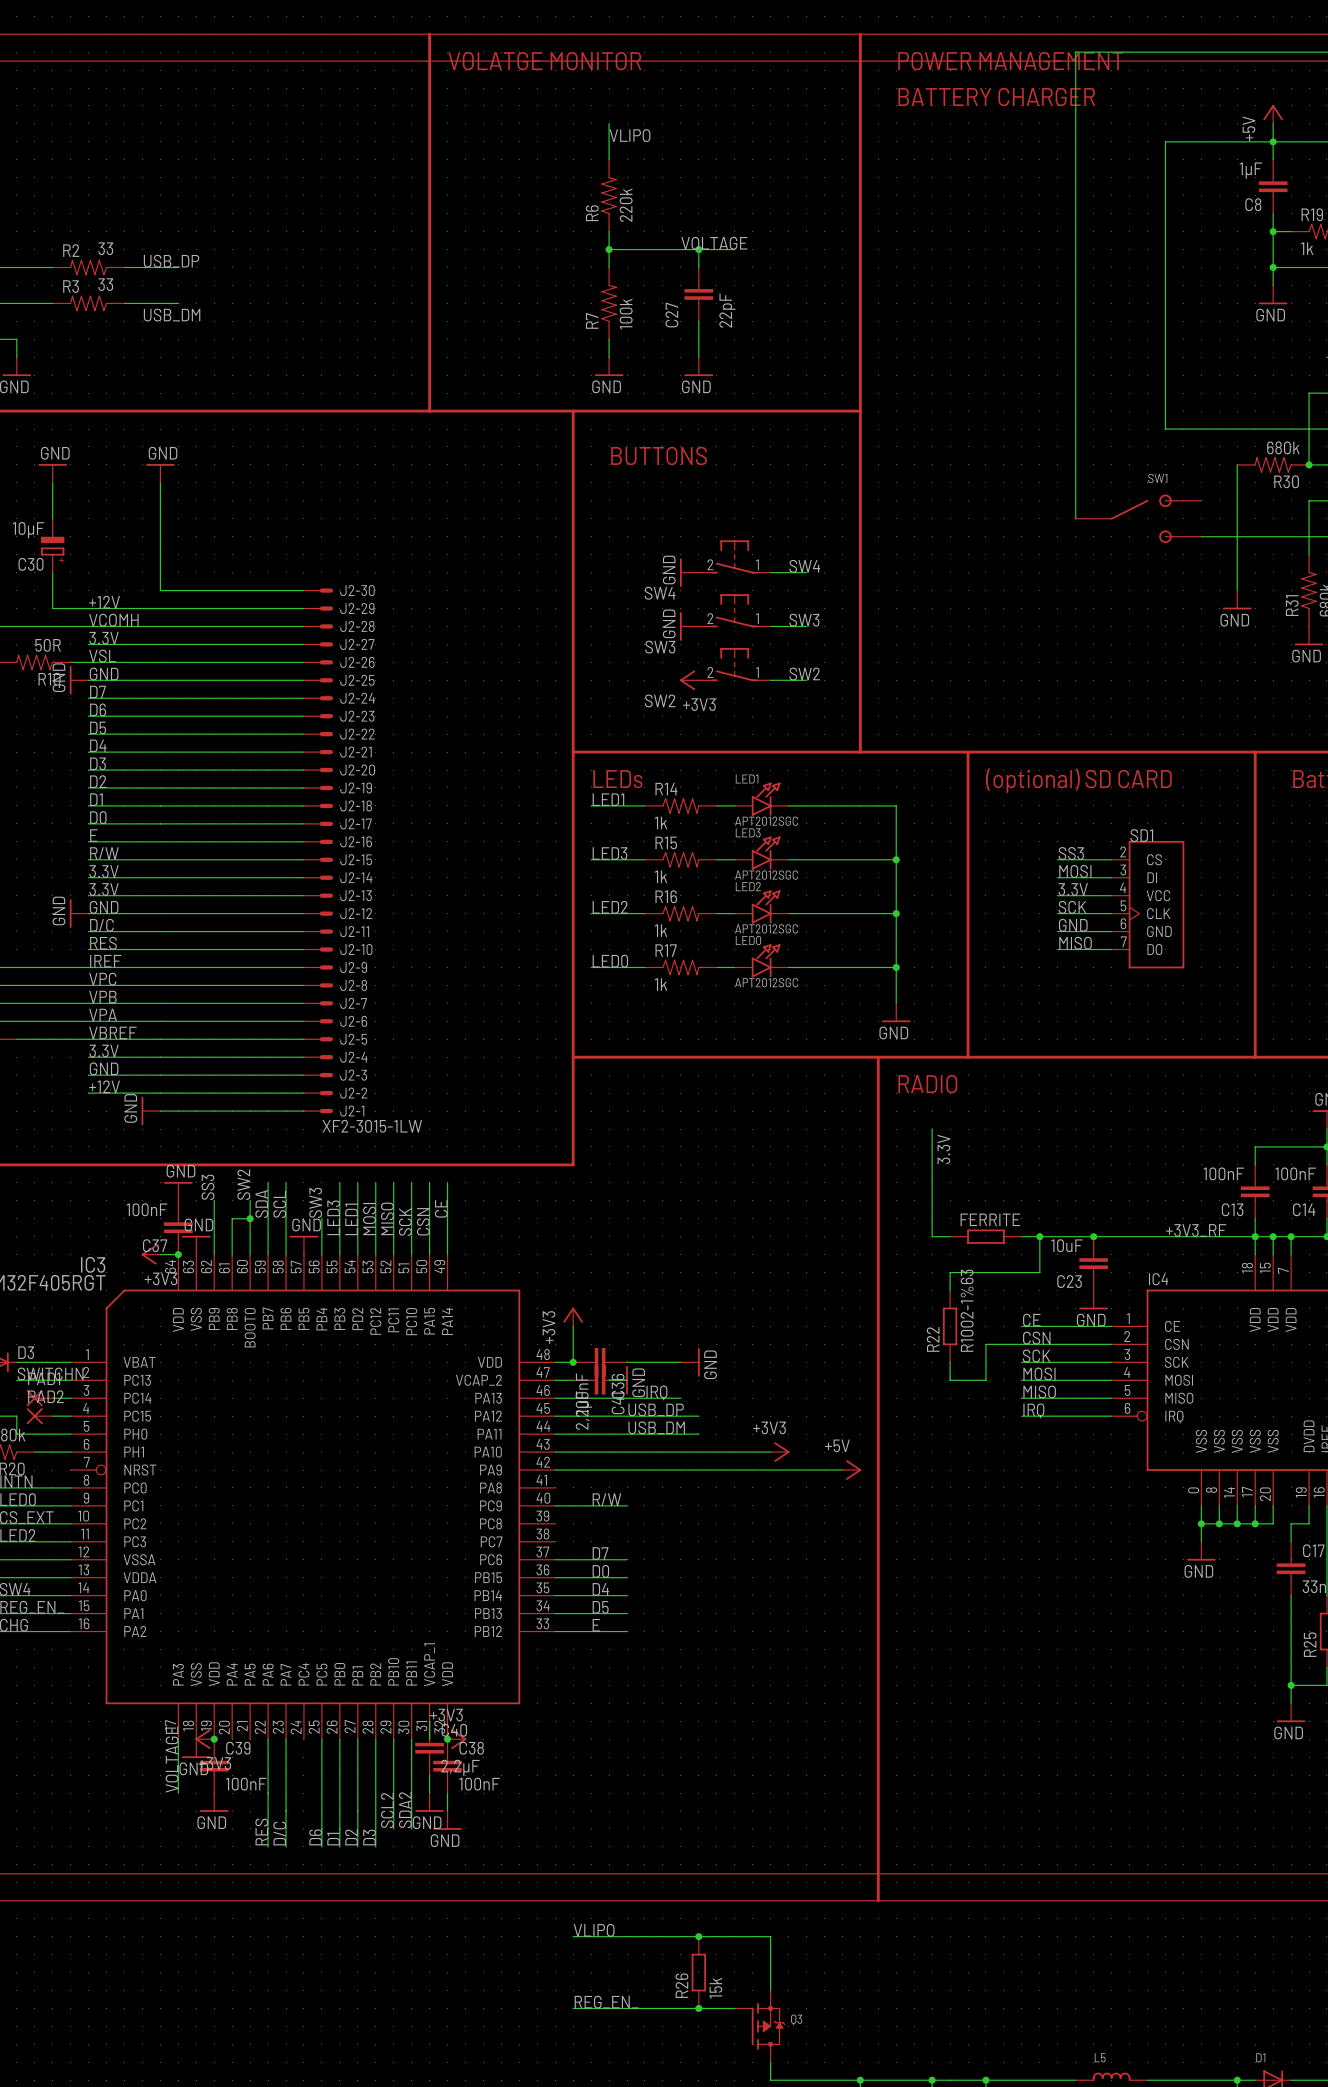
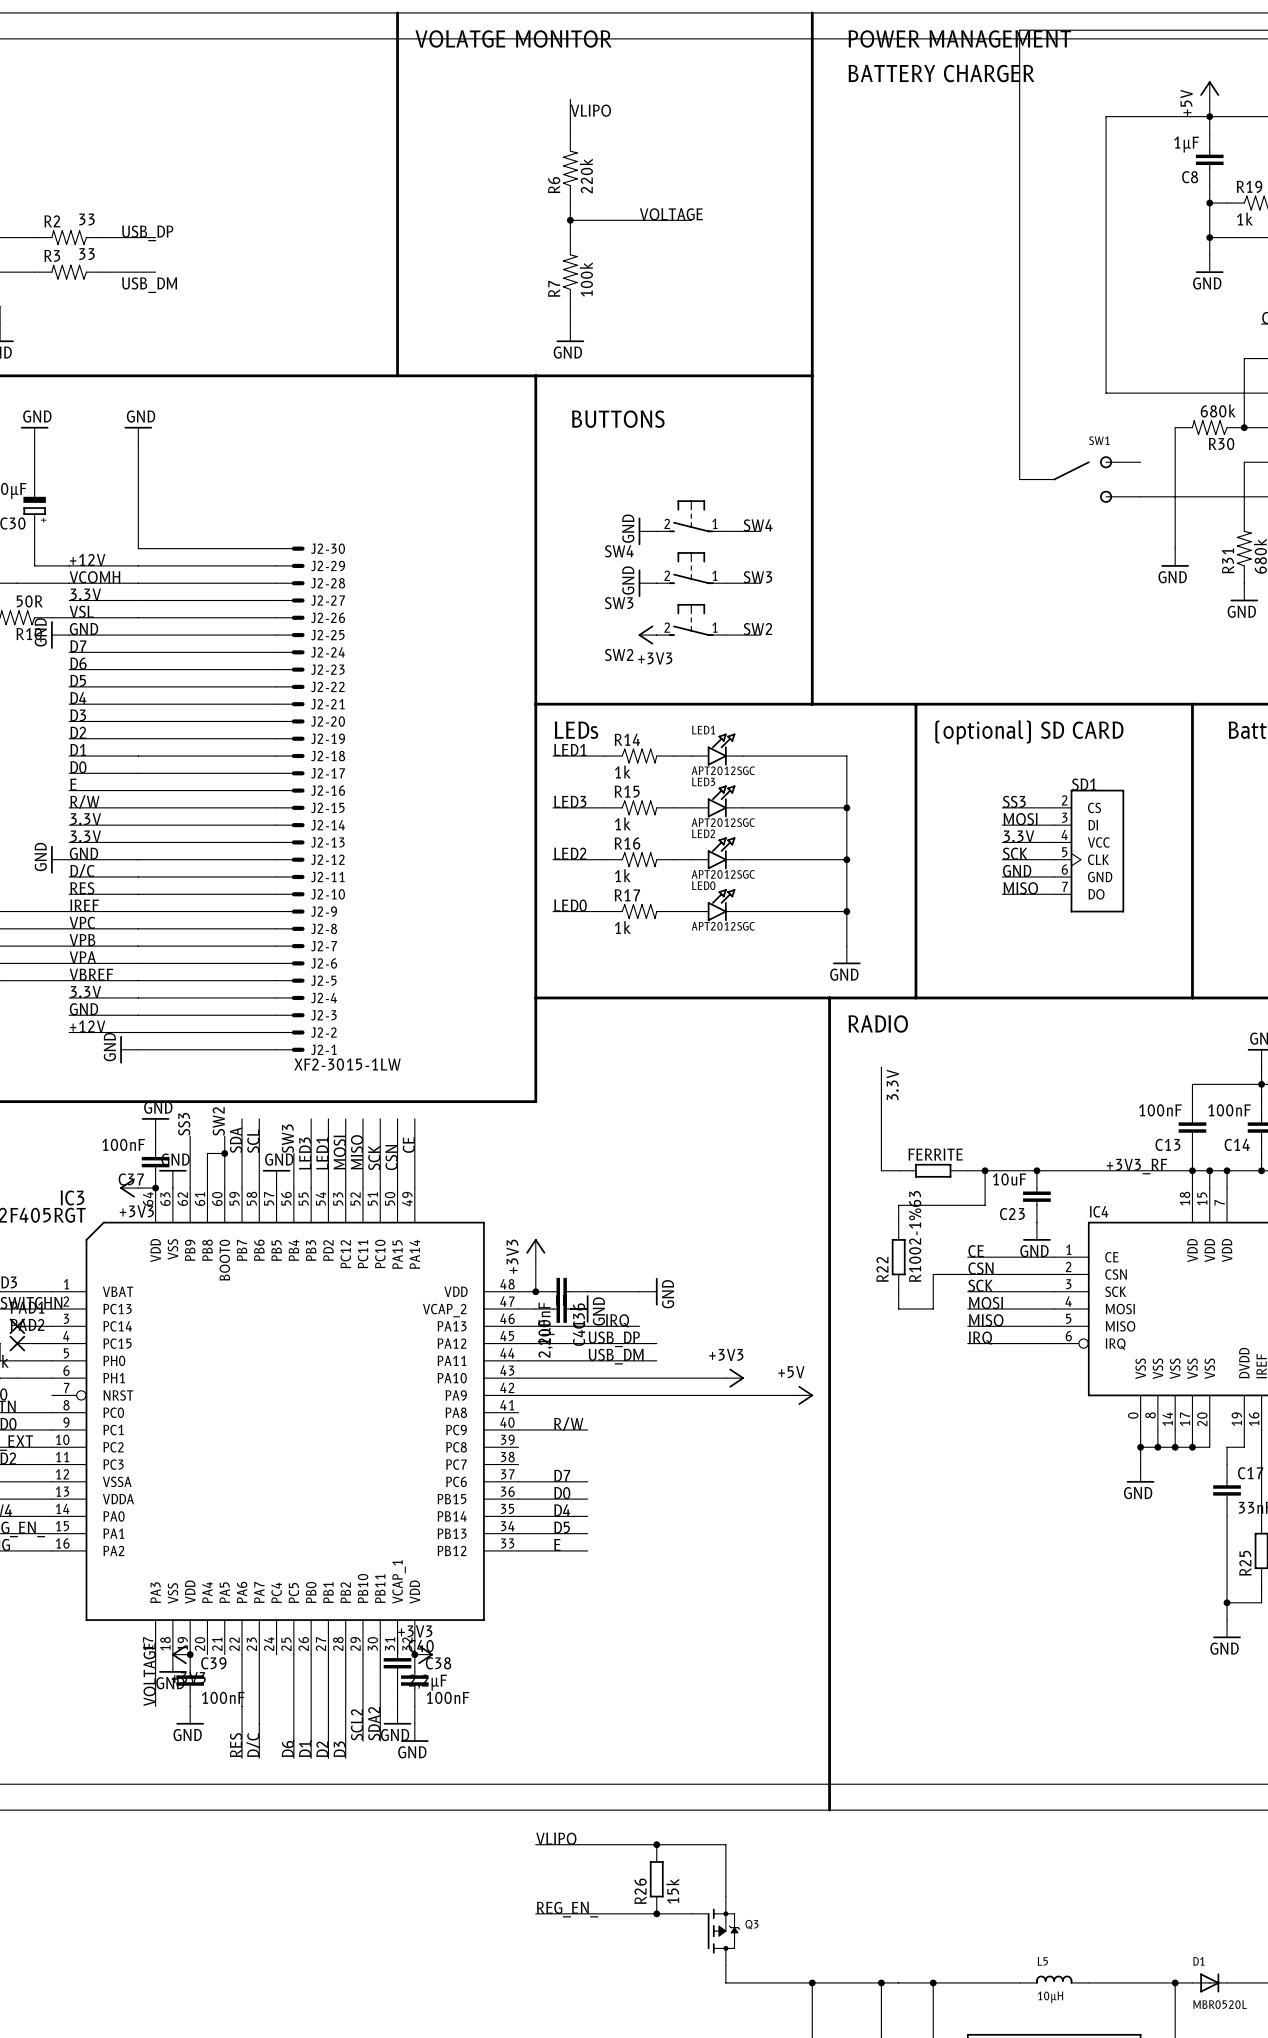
wire: (698, 249) (698, 267) -> none
junction: (698, 249) -> none
C27: 22pF (698, 294) -> none
wire: (698, 321) (698, 357) -> none
power symbol: GND (698, 366) -> none

